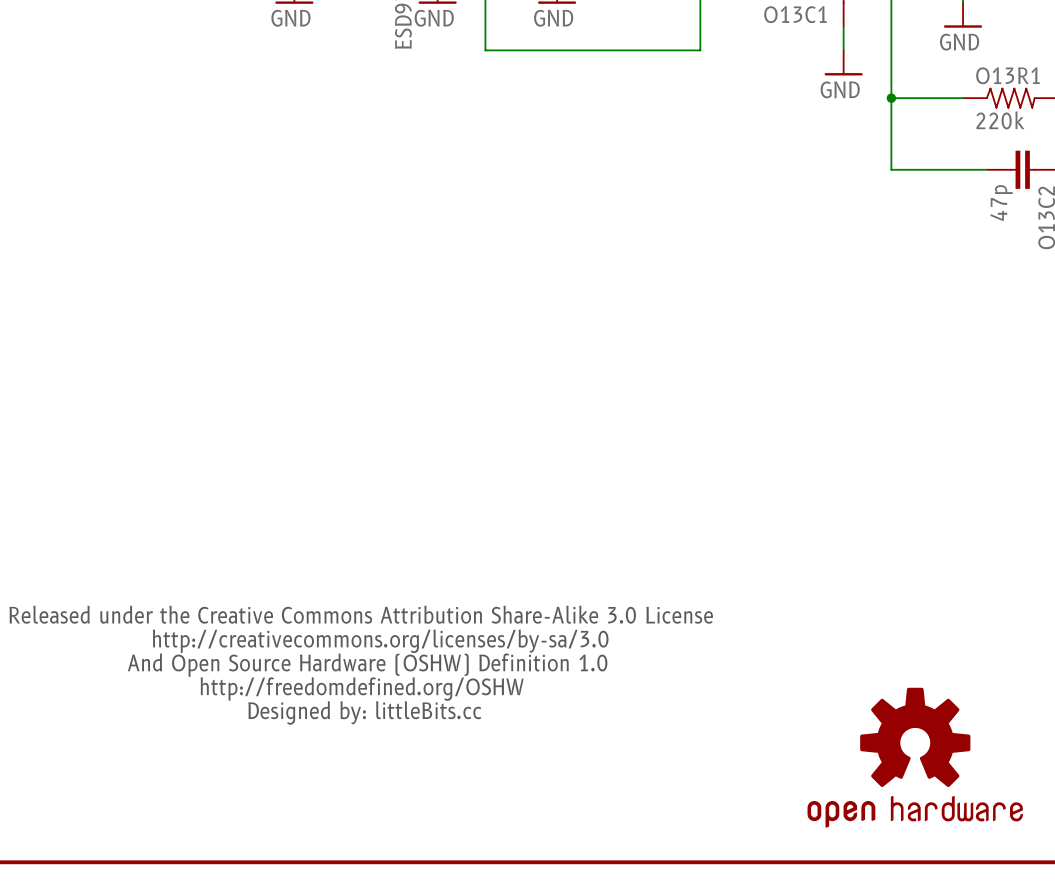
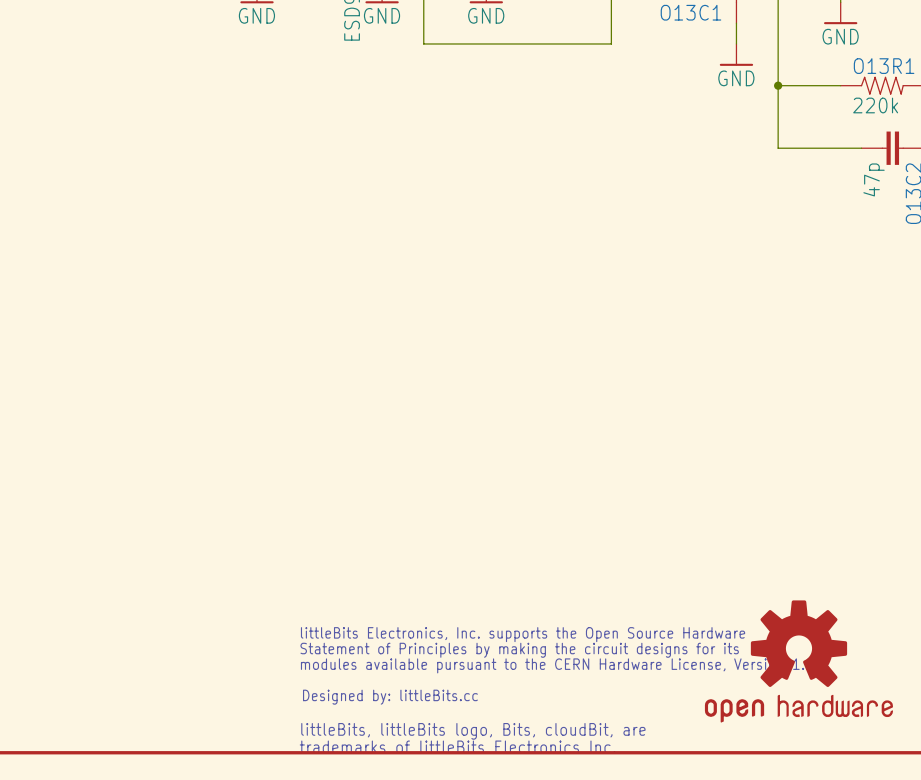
part: (361, 665) -> none
part: none -> (556, 690)

